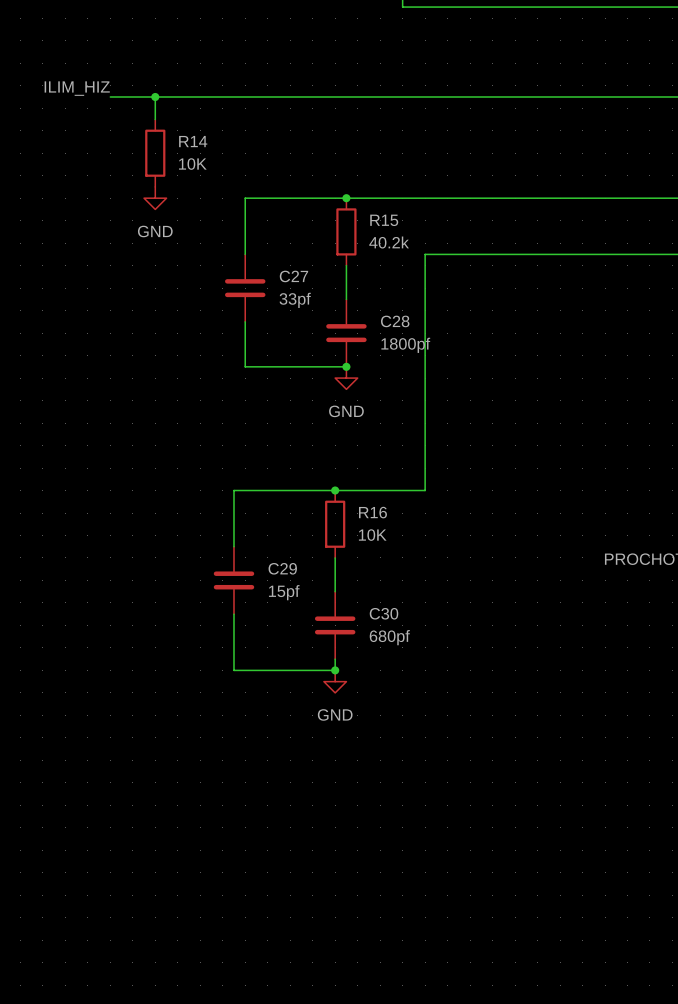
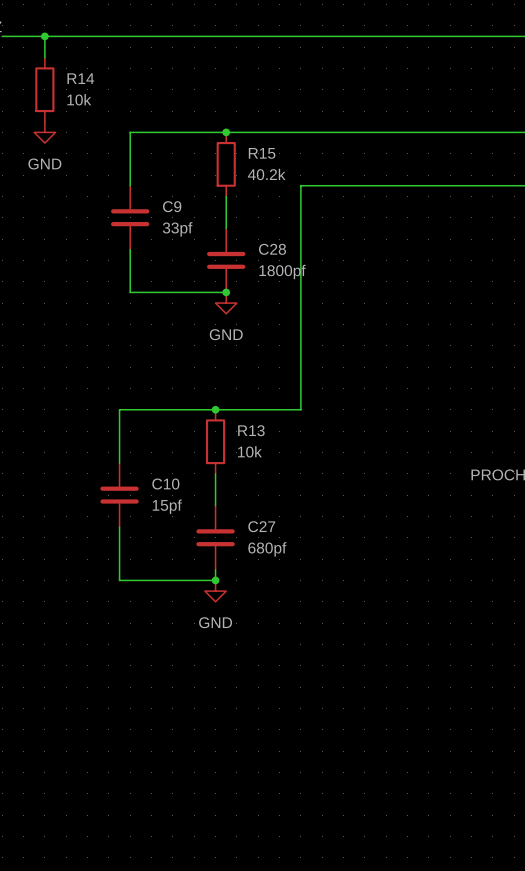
R14 value: 10K (192, 164) -> 10k (79, 99)
C27 name: C27 (293, 276) -> C9 (172, 206)
R16 name: R16 (372, 512) -> R13 (251, 430)
R16 value: 10K (372, 535) -> 10k (249, 451)
C29 name: C29 (282, 568) -> C10 (165, 484)
C30 name: C30 (383, 613) -> C27 (261, 526)

